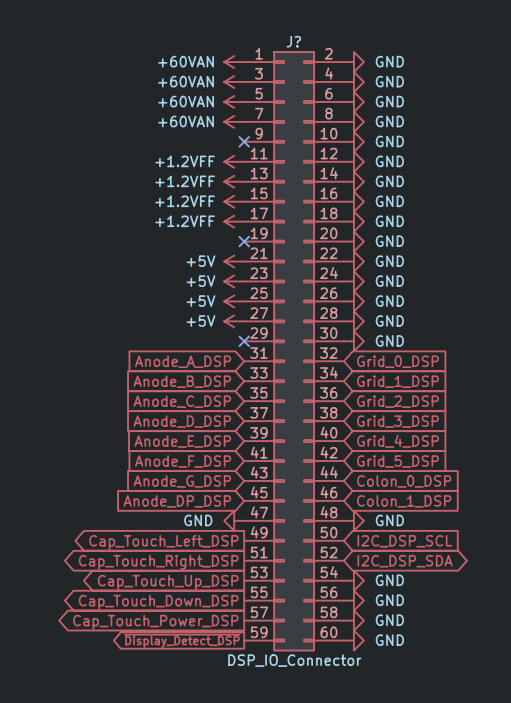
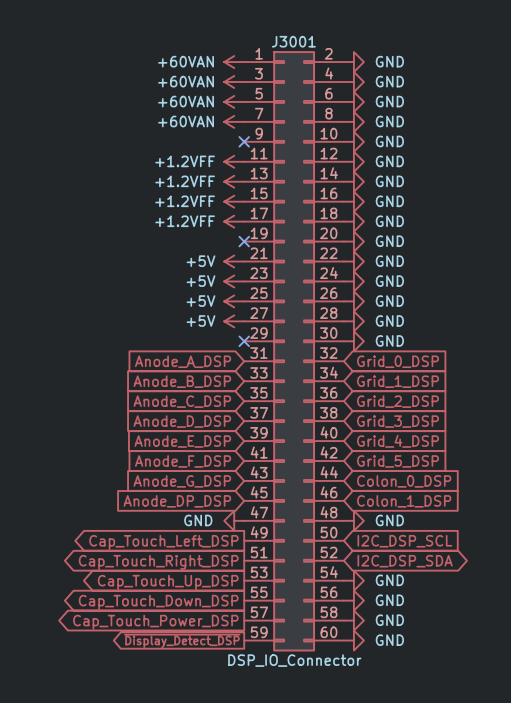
J? name: J? (293, 41) -> J3001 (293, 41)

